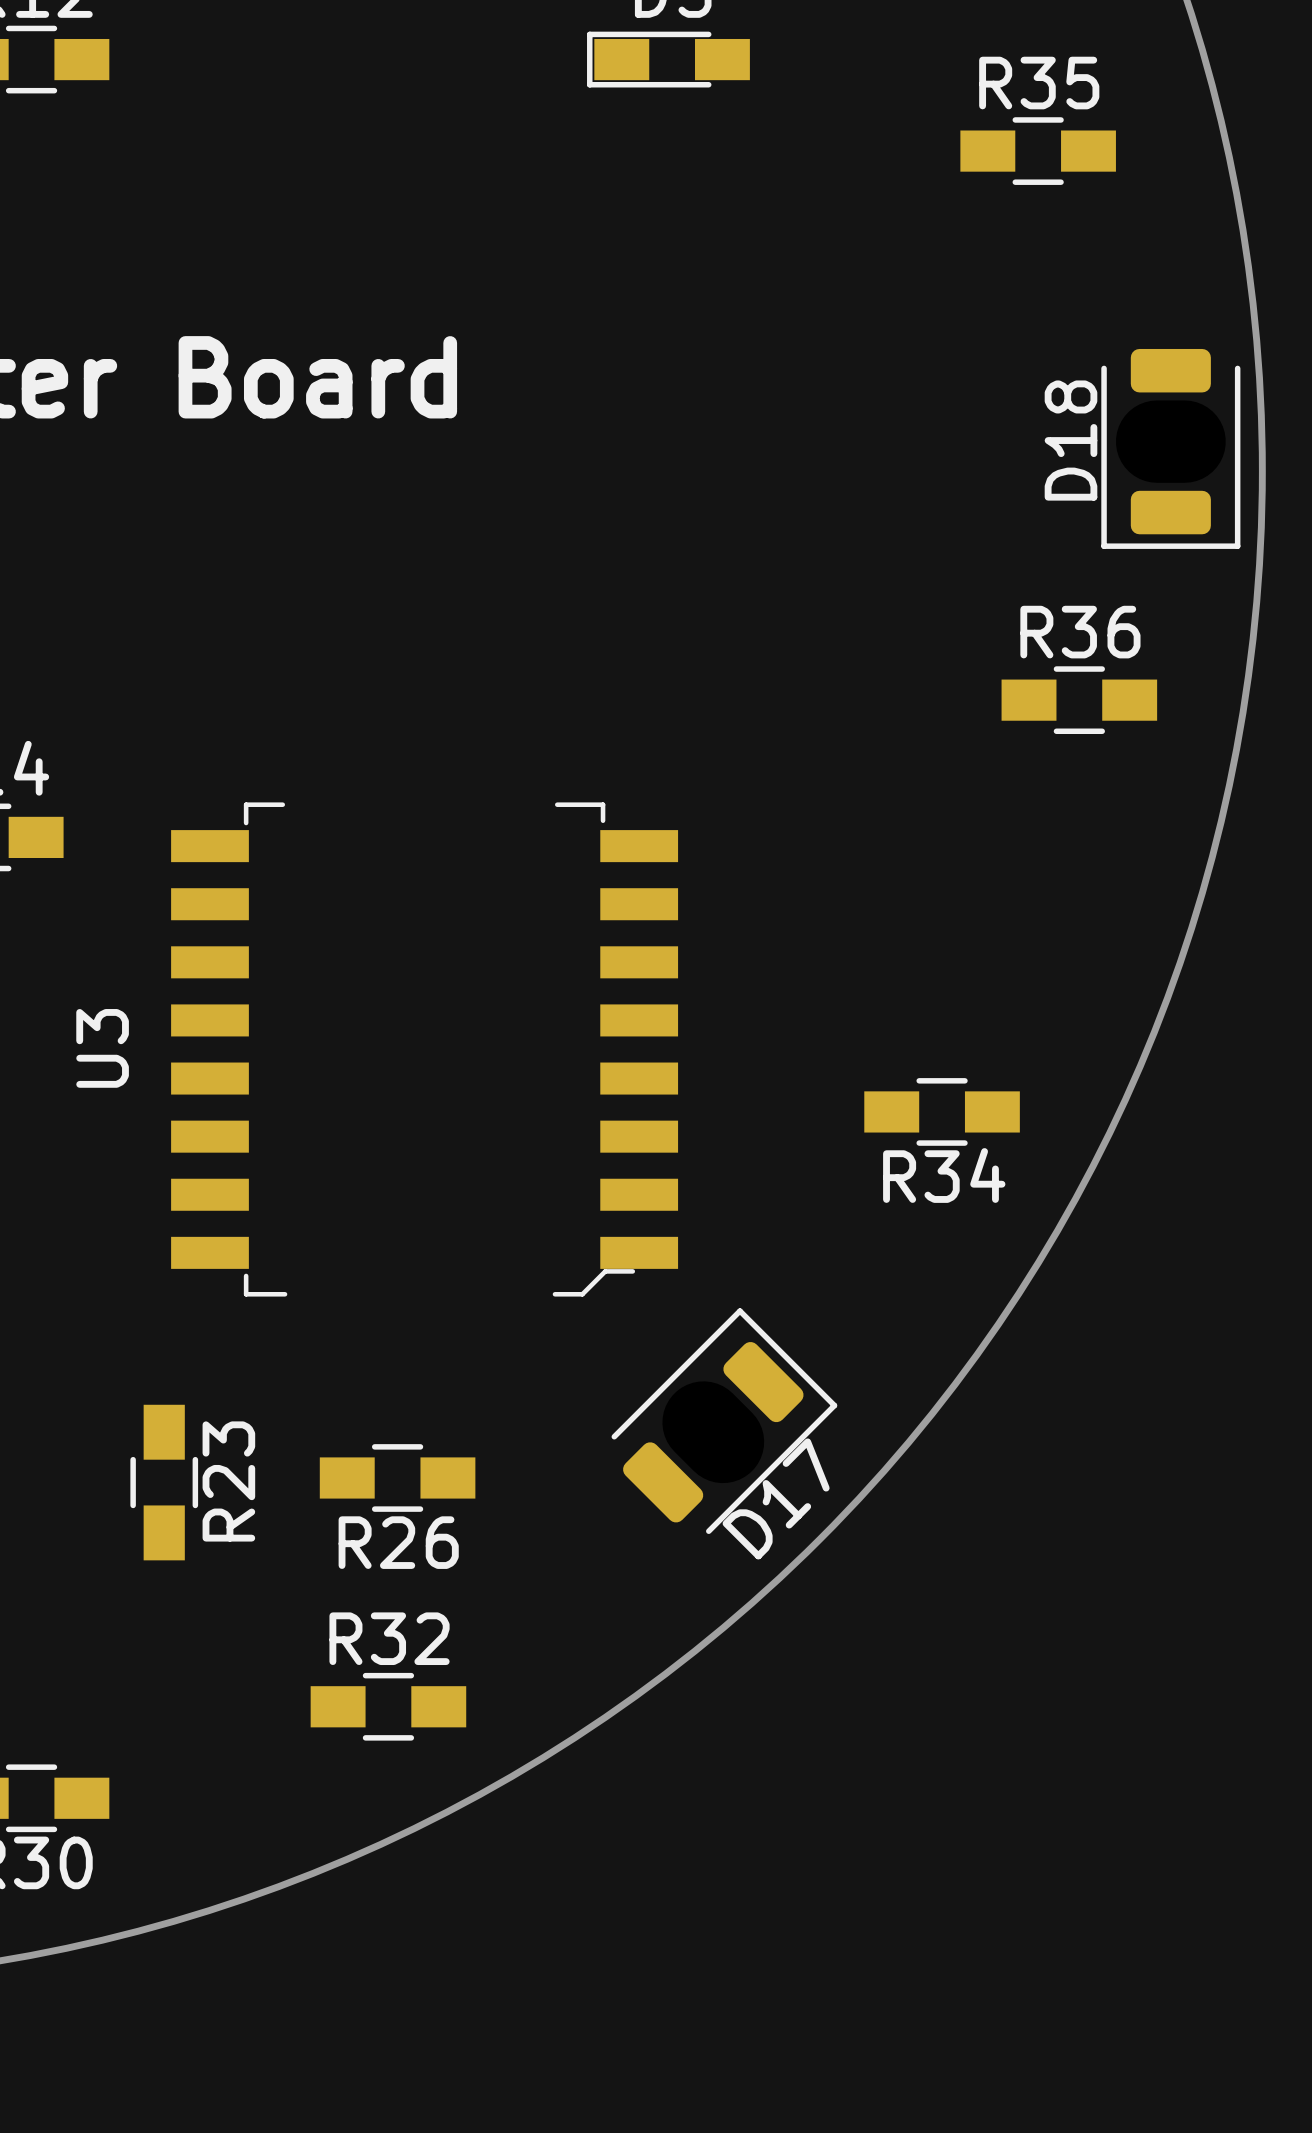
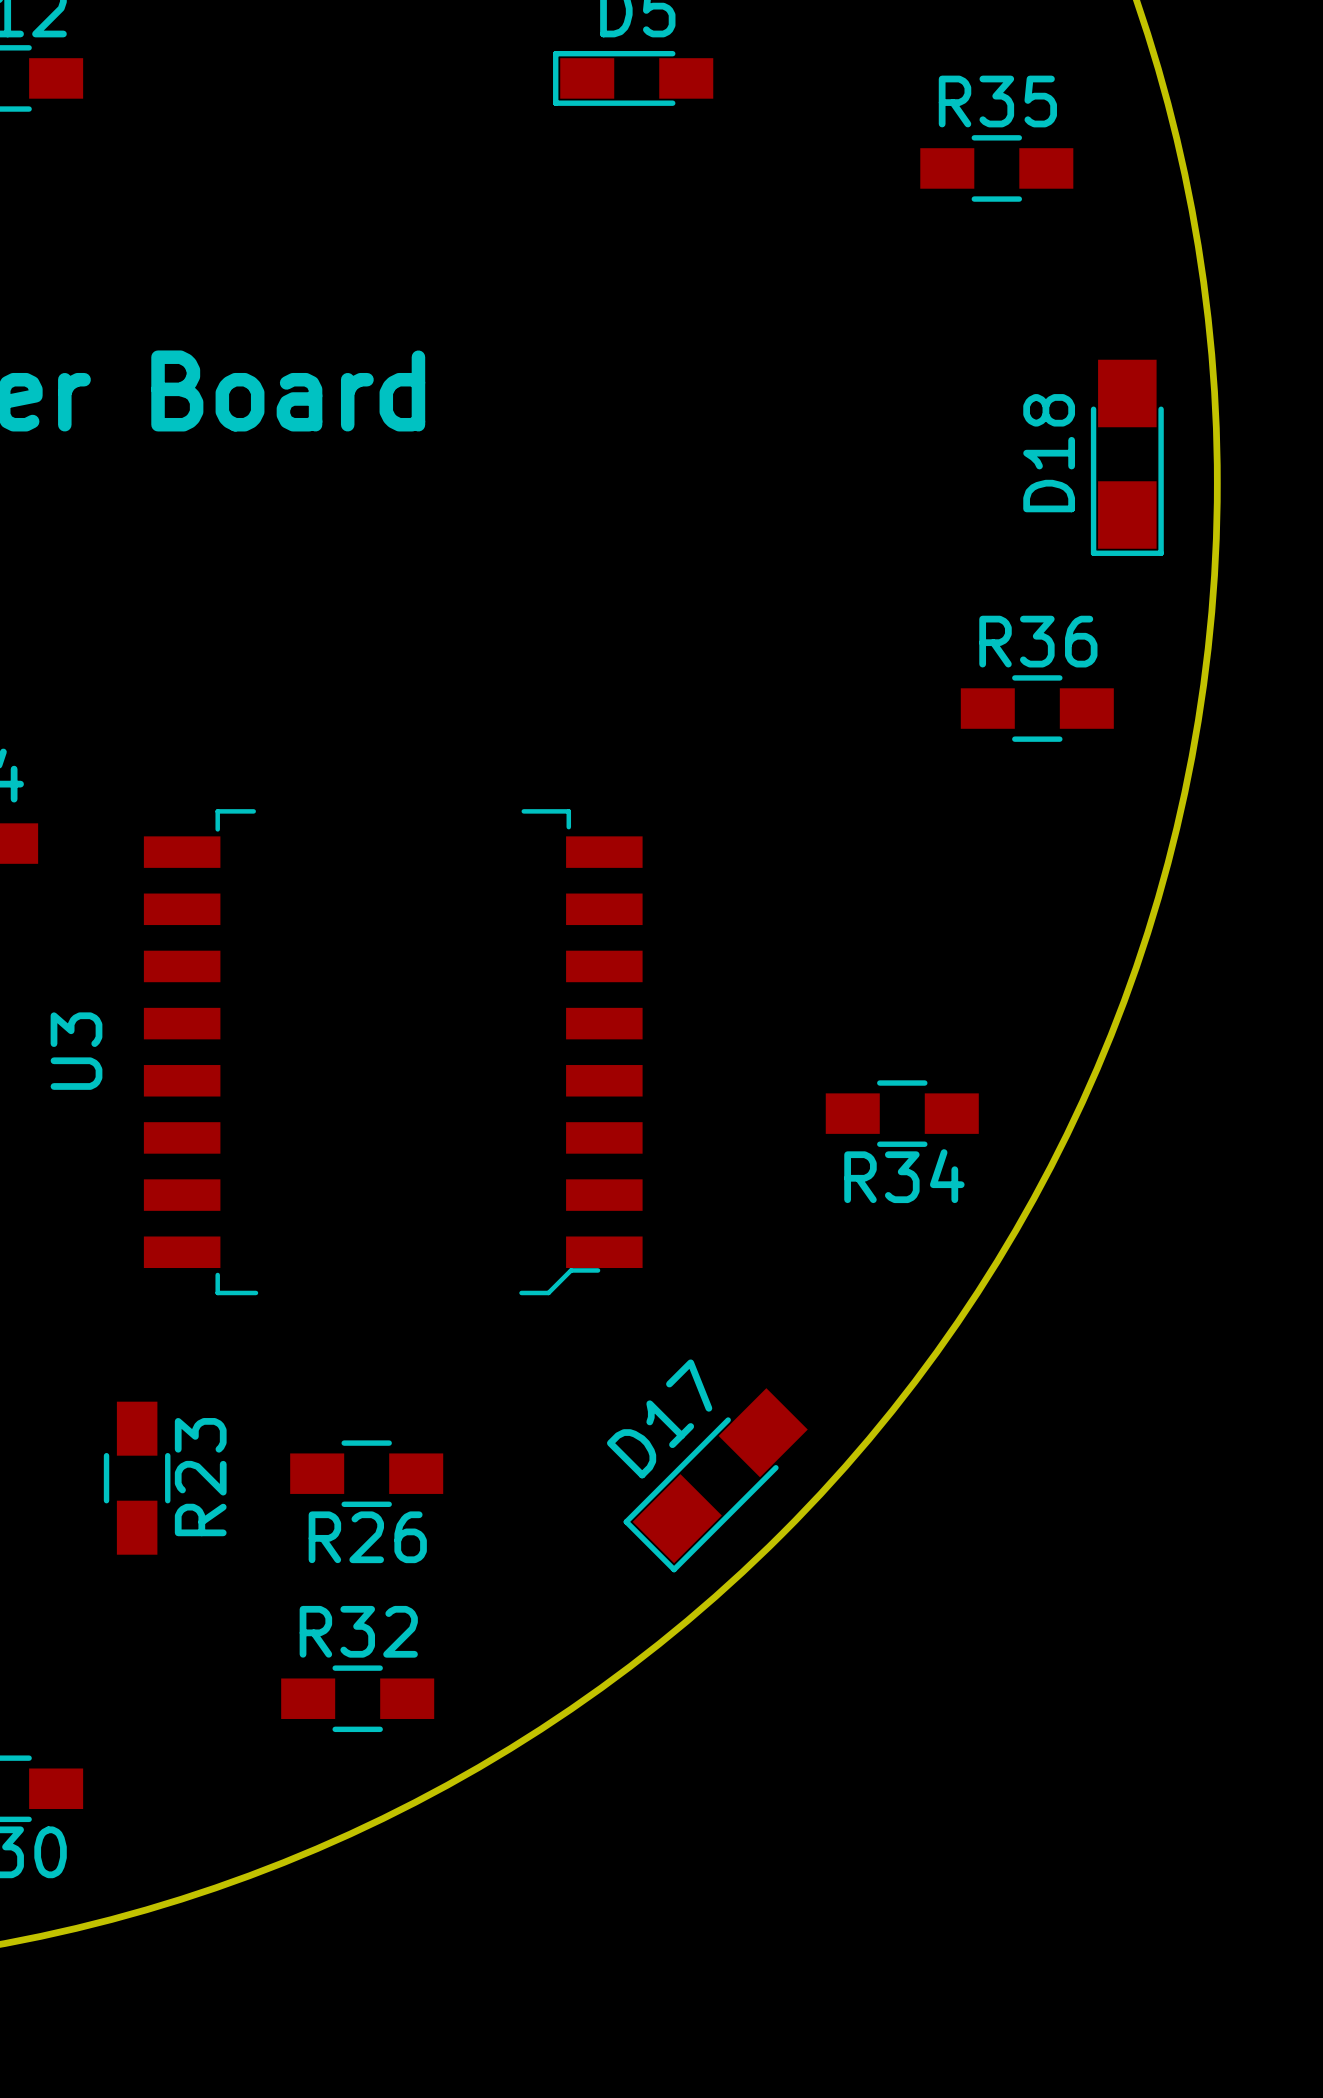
D18 footprint: [1101, 348, 1241, 549] -> [1090, 359, 1164, 556]
D17 footprint: [611, 1308, 838, 1534] -> [623, 1388, 808, 1573]
D17 name position: D17 (776, 1498) -> D17 (659, 1418)

